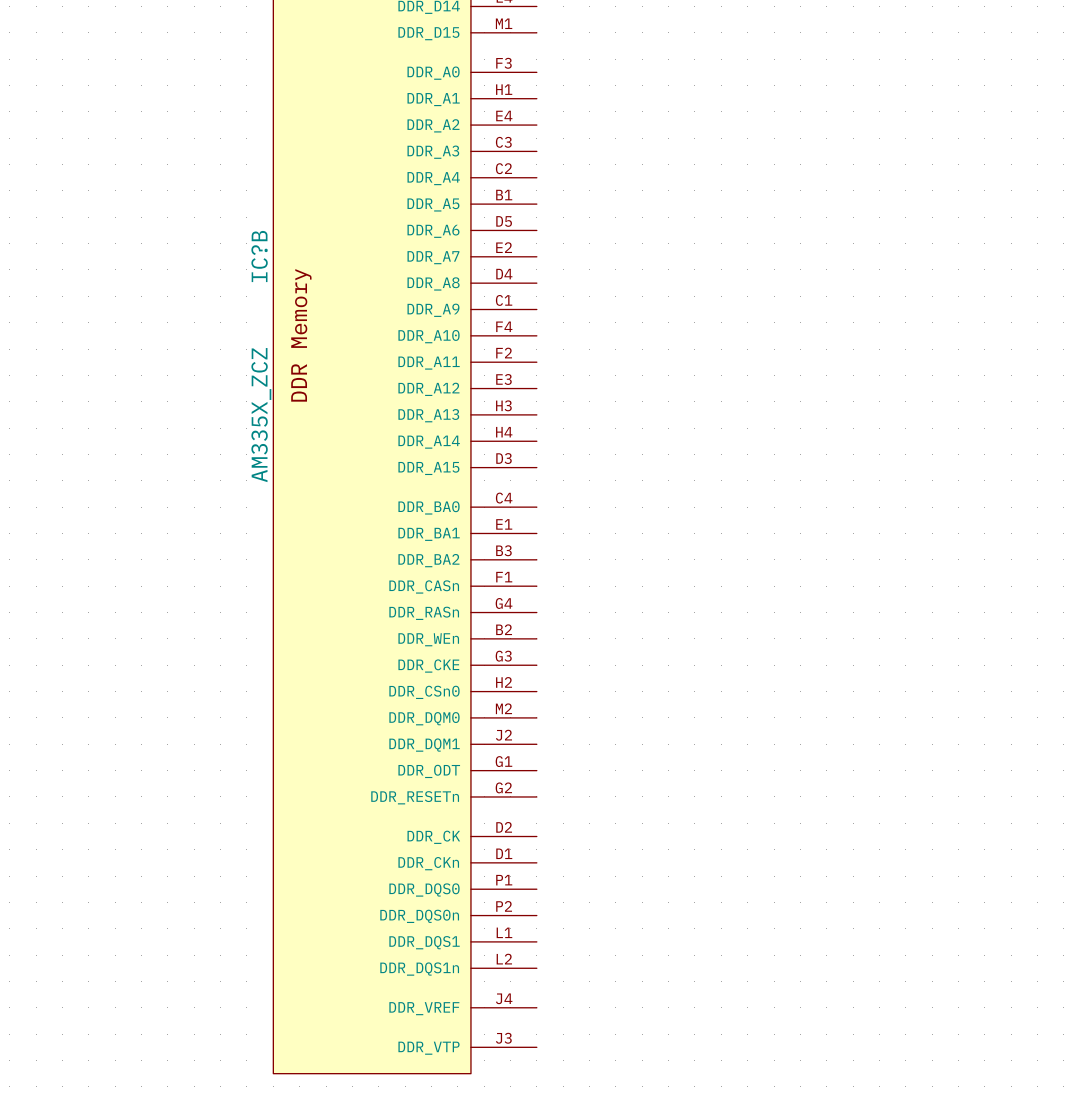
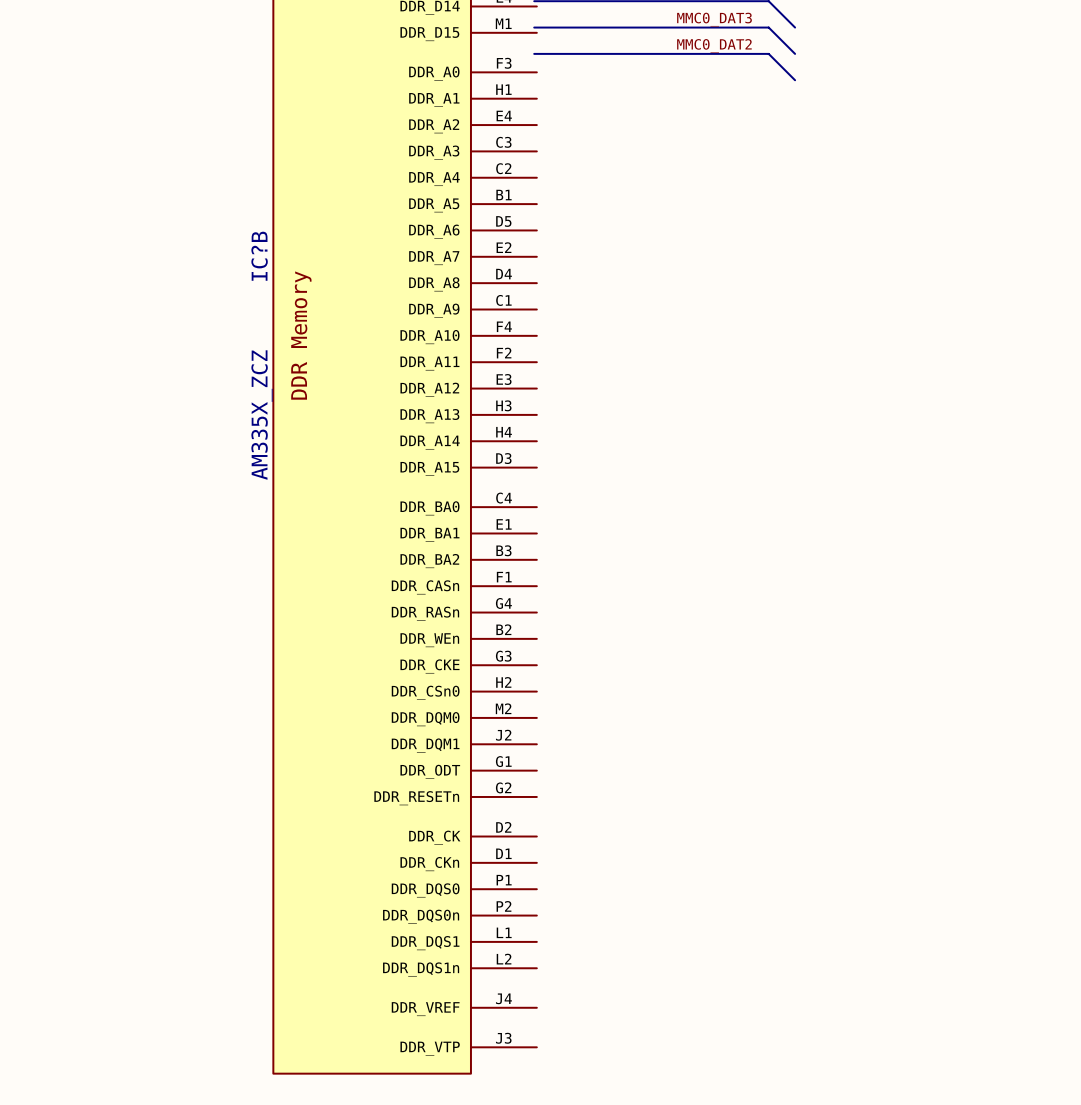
wire: none -> (534, 1) (768, 1) (795, 27)
label: none -> MMC0_DAT3 (714, 19)
wire: none -> (534, 27) (768, 27) (795, 53)
label: none -> MMC0_DAT2 (714, 45)
wire: none -> (534, 53) (768, 53) (795, 80)

